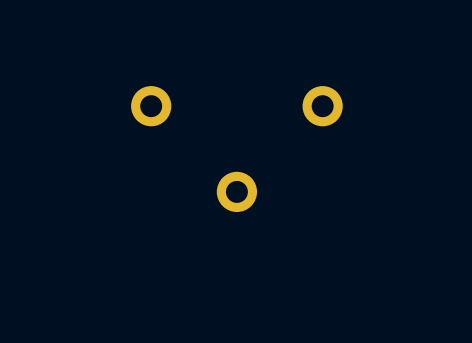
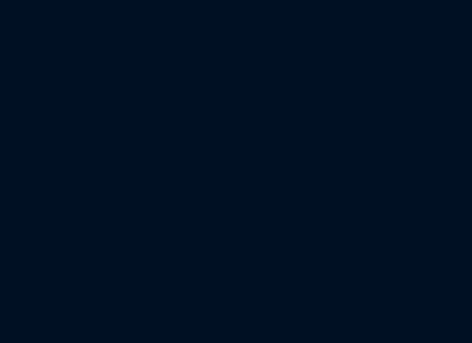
part: (236, 149) -> none

